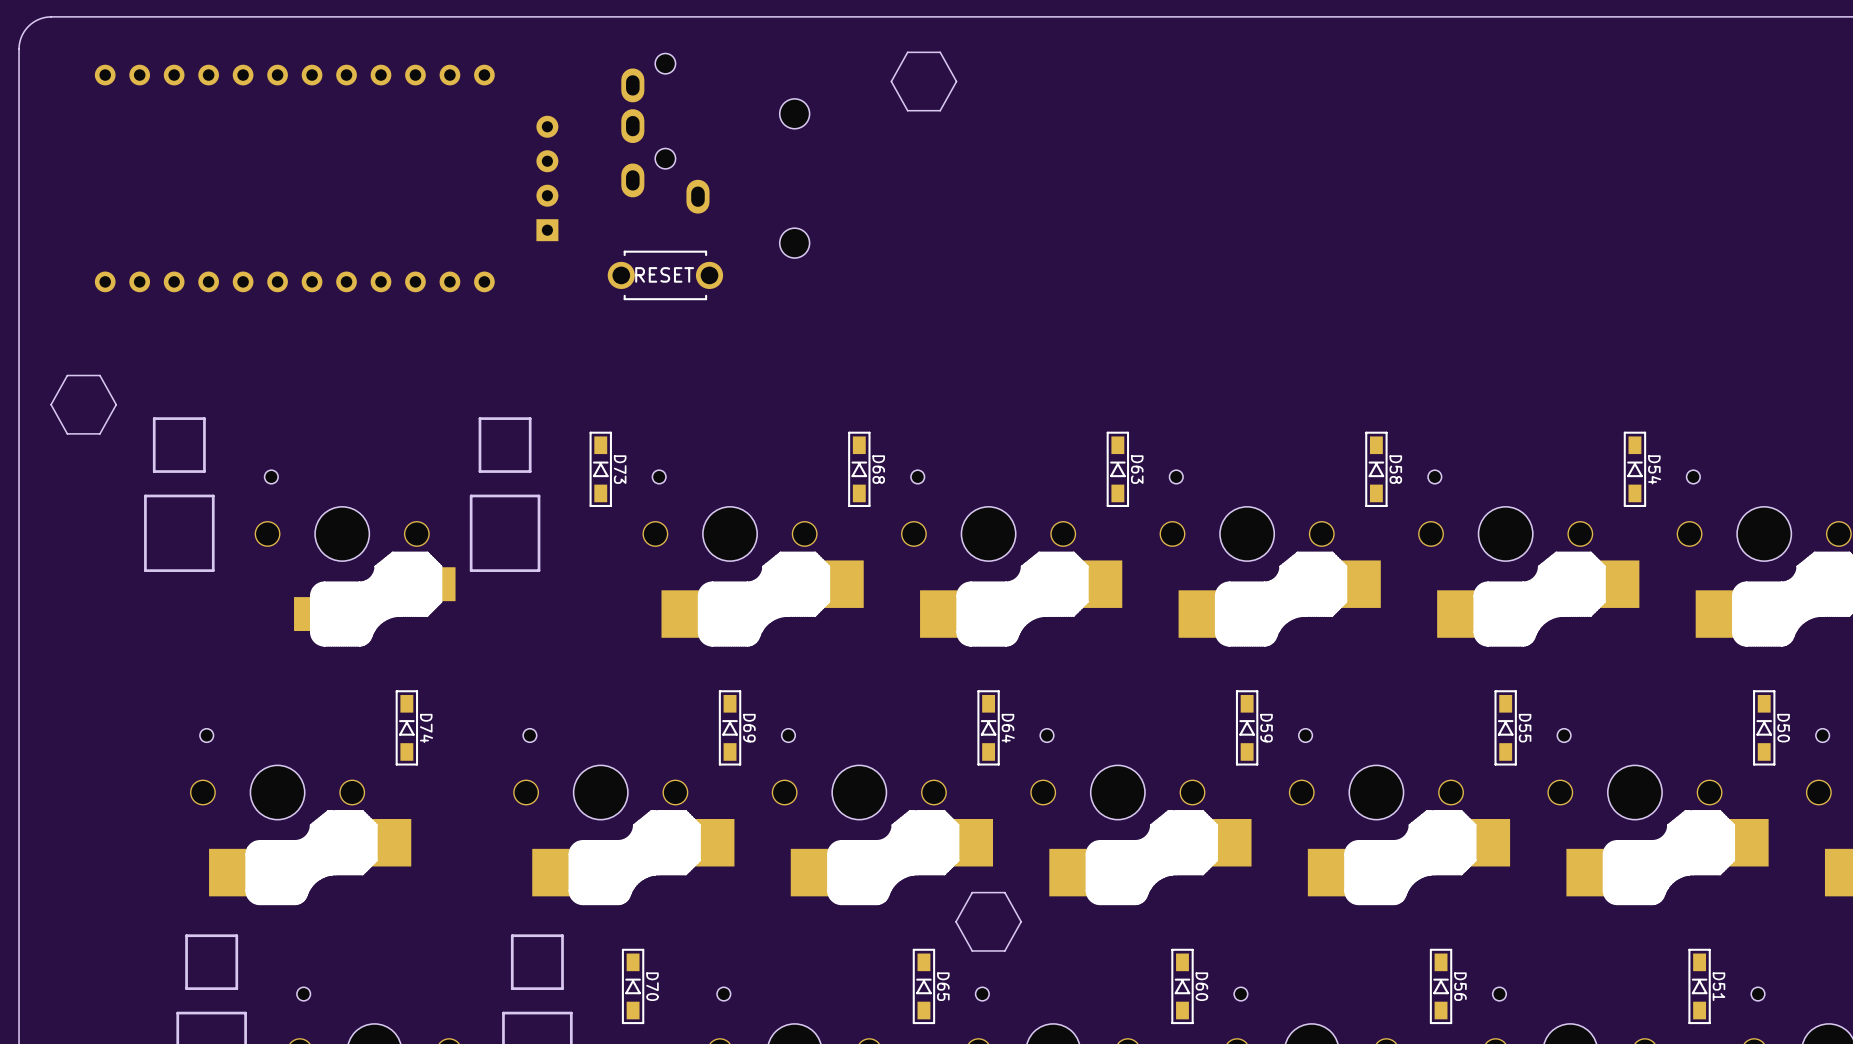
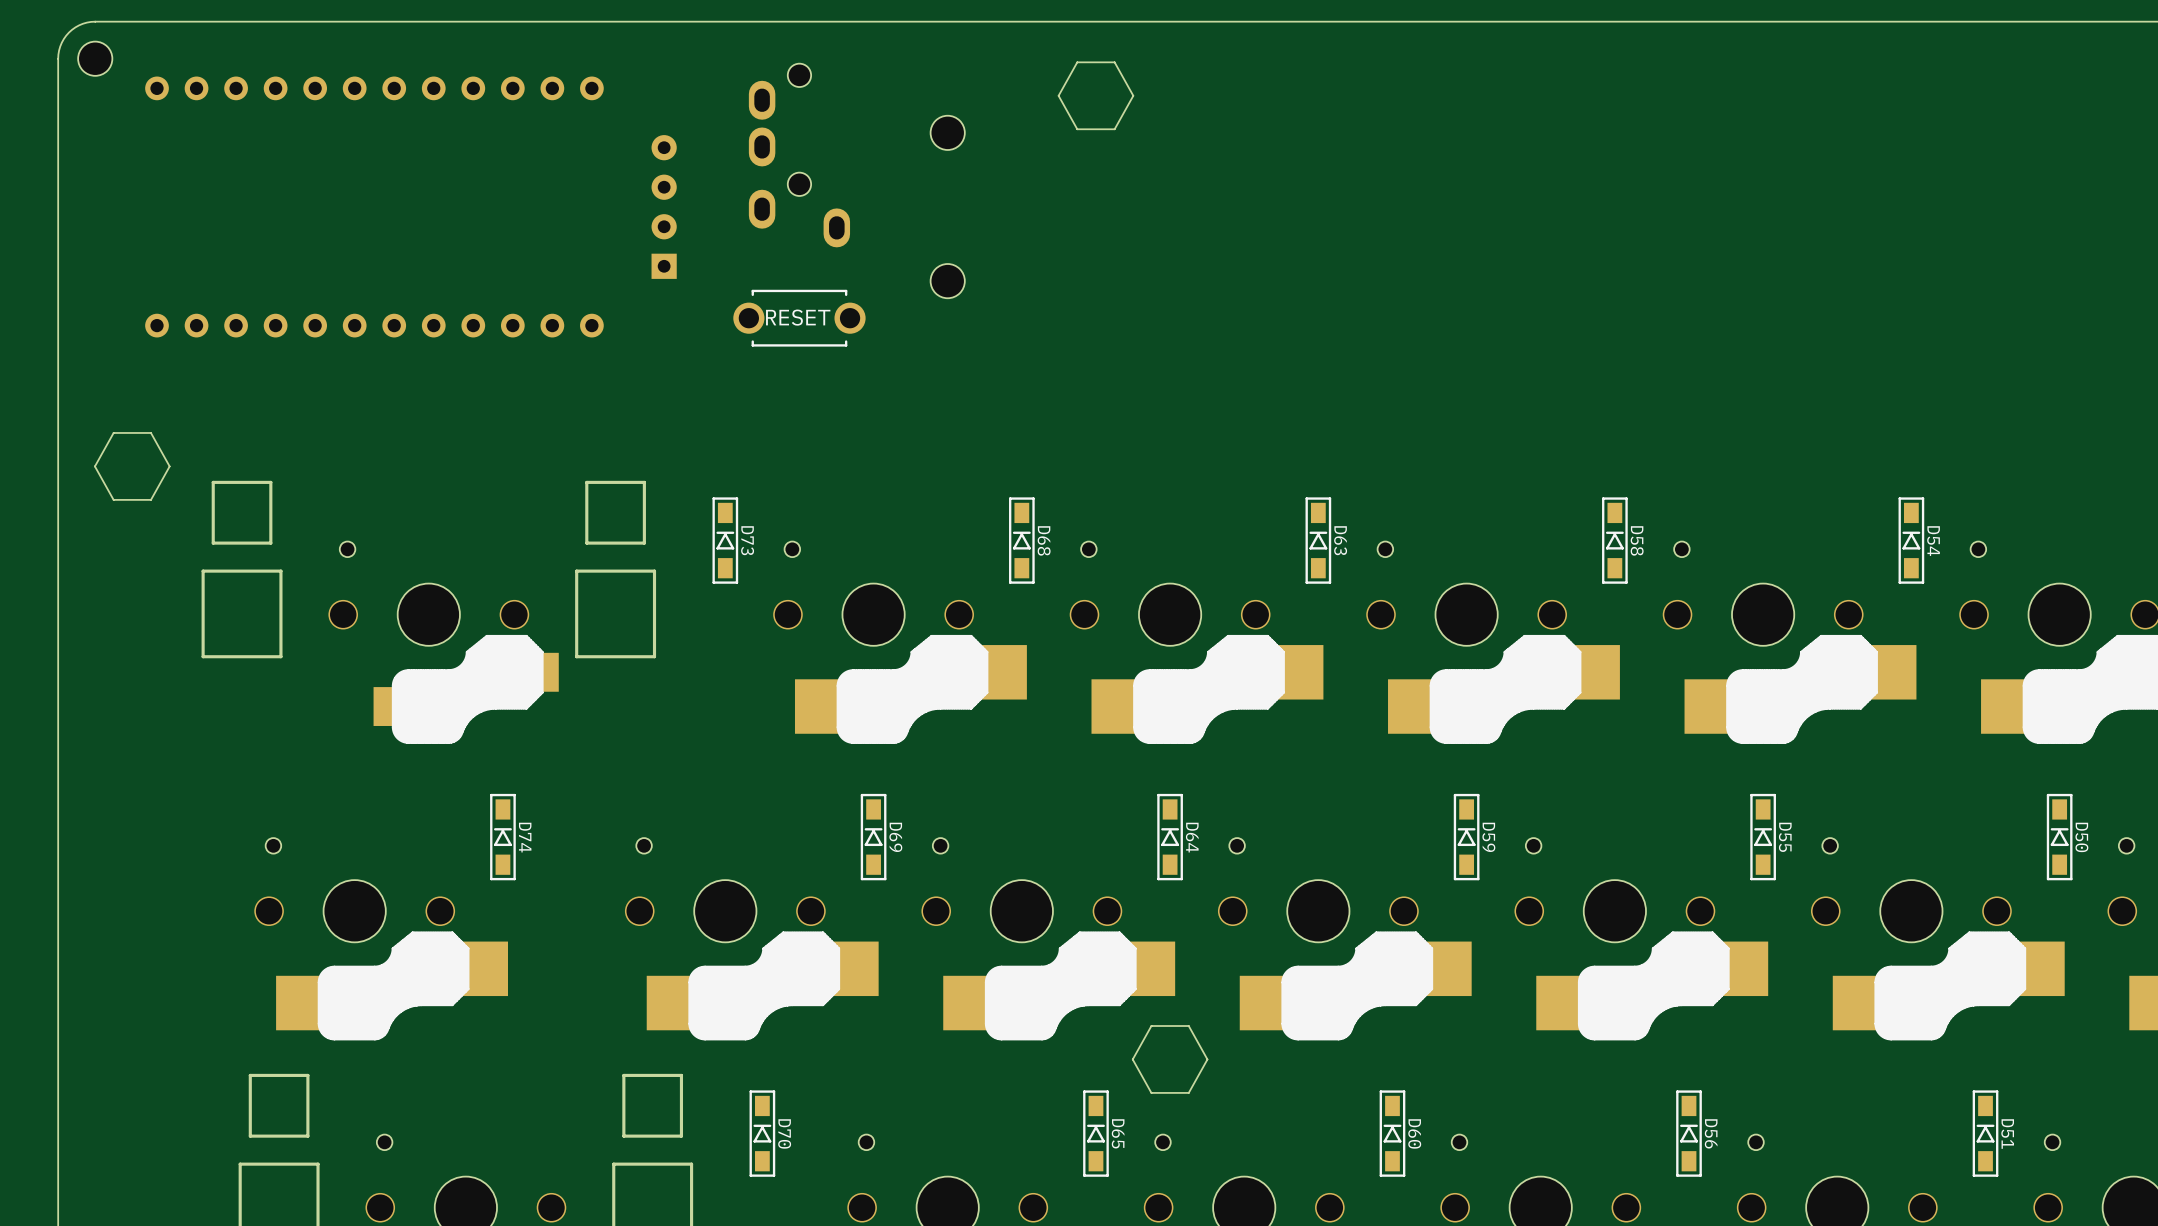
part: none -> (95, 58)

